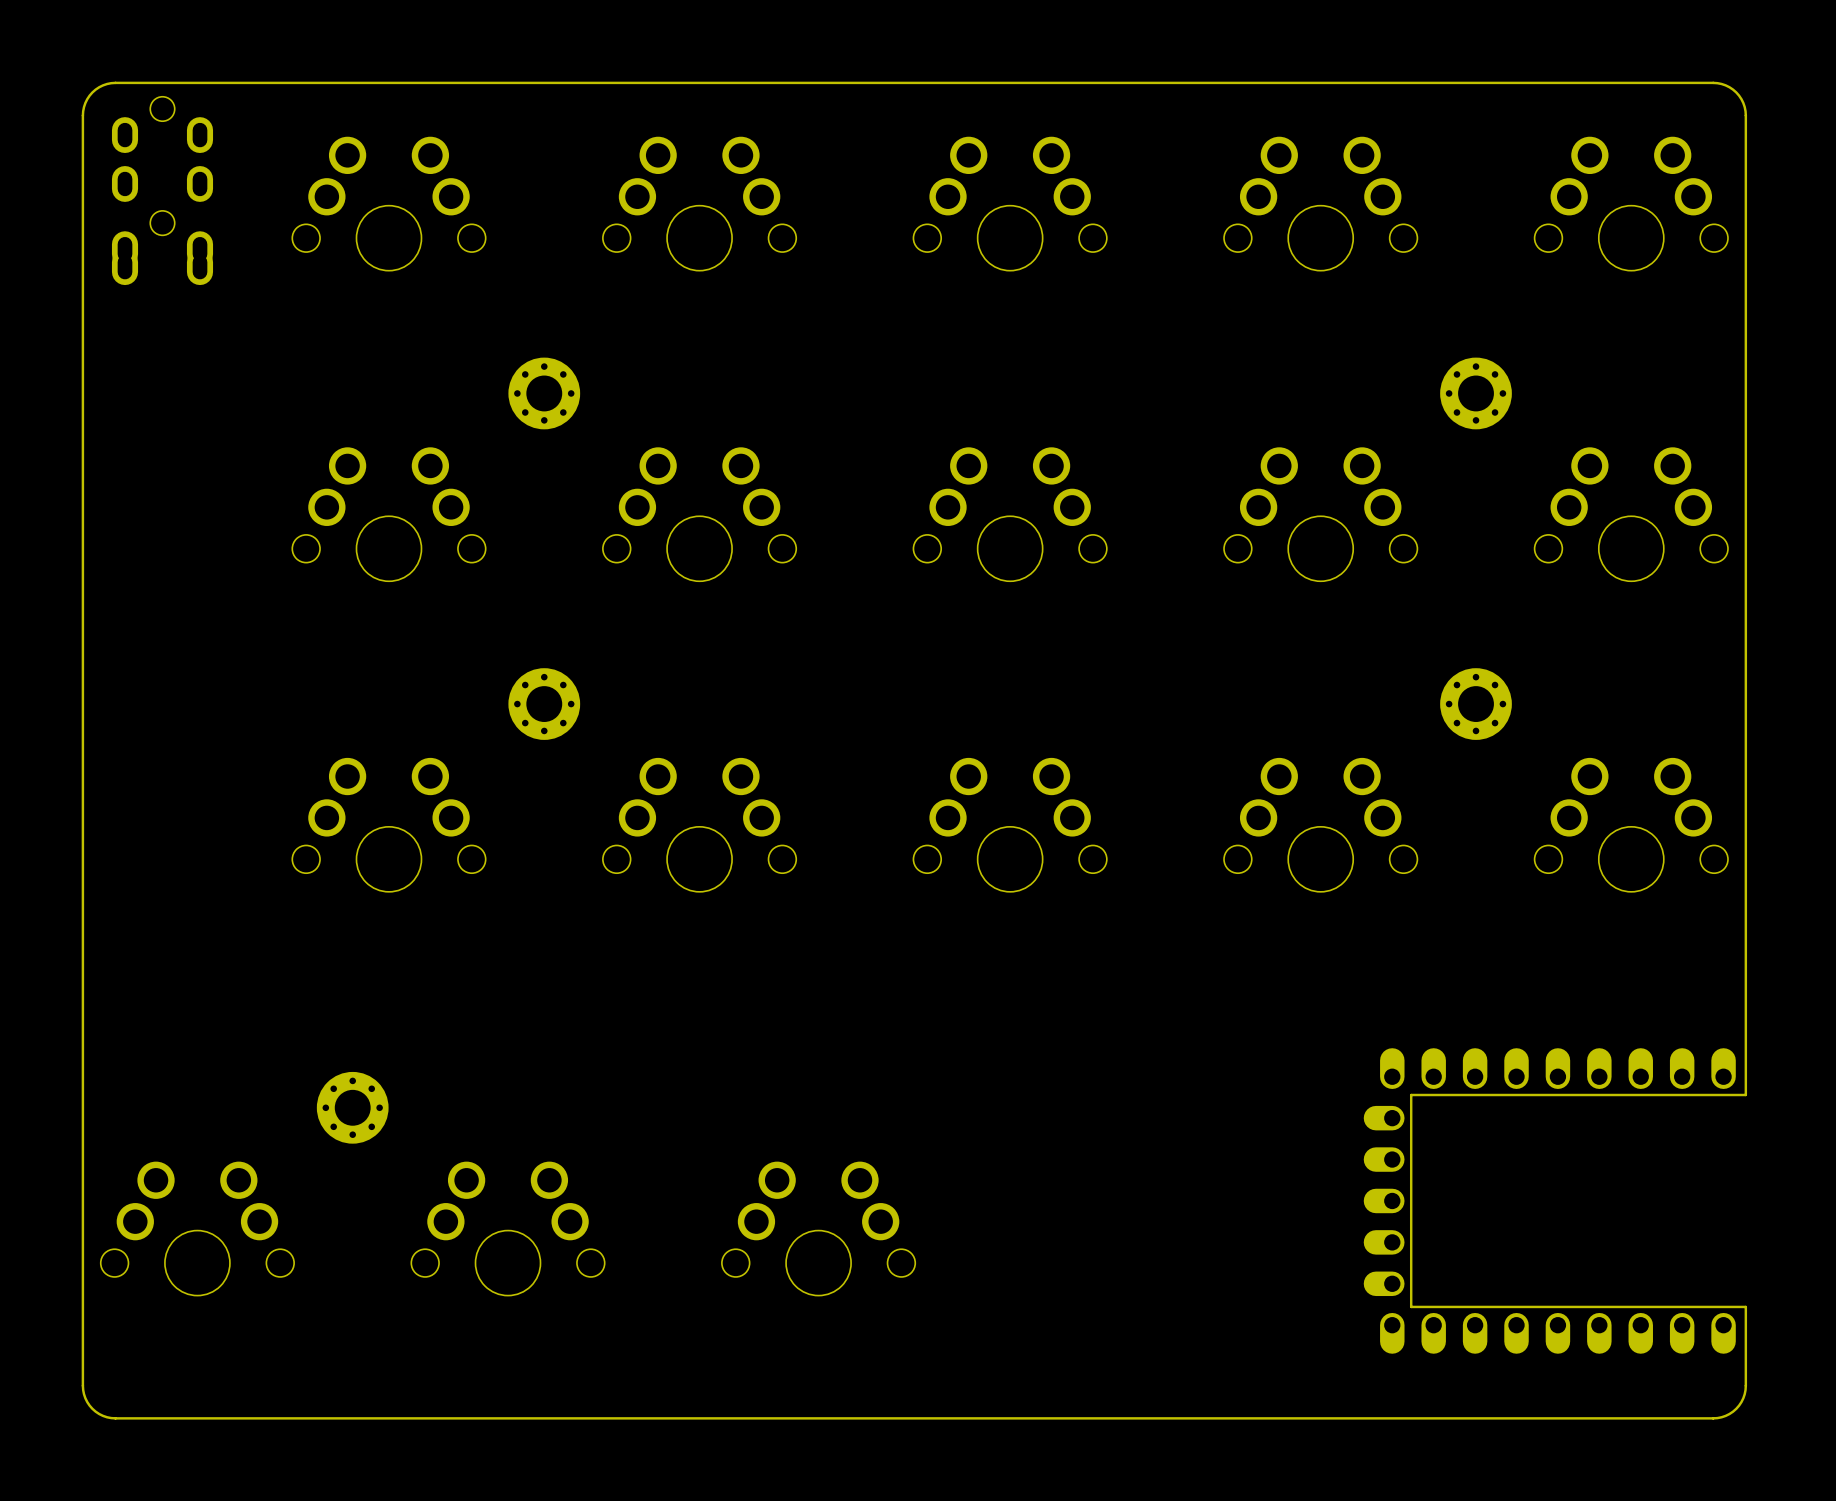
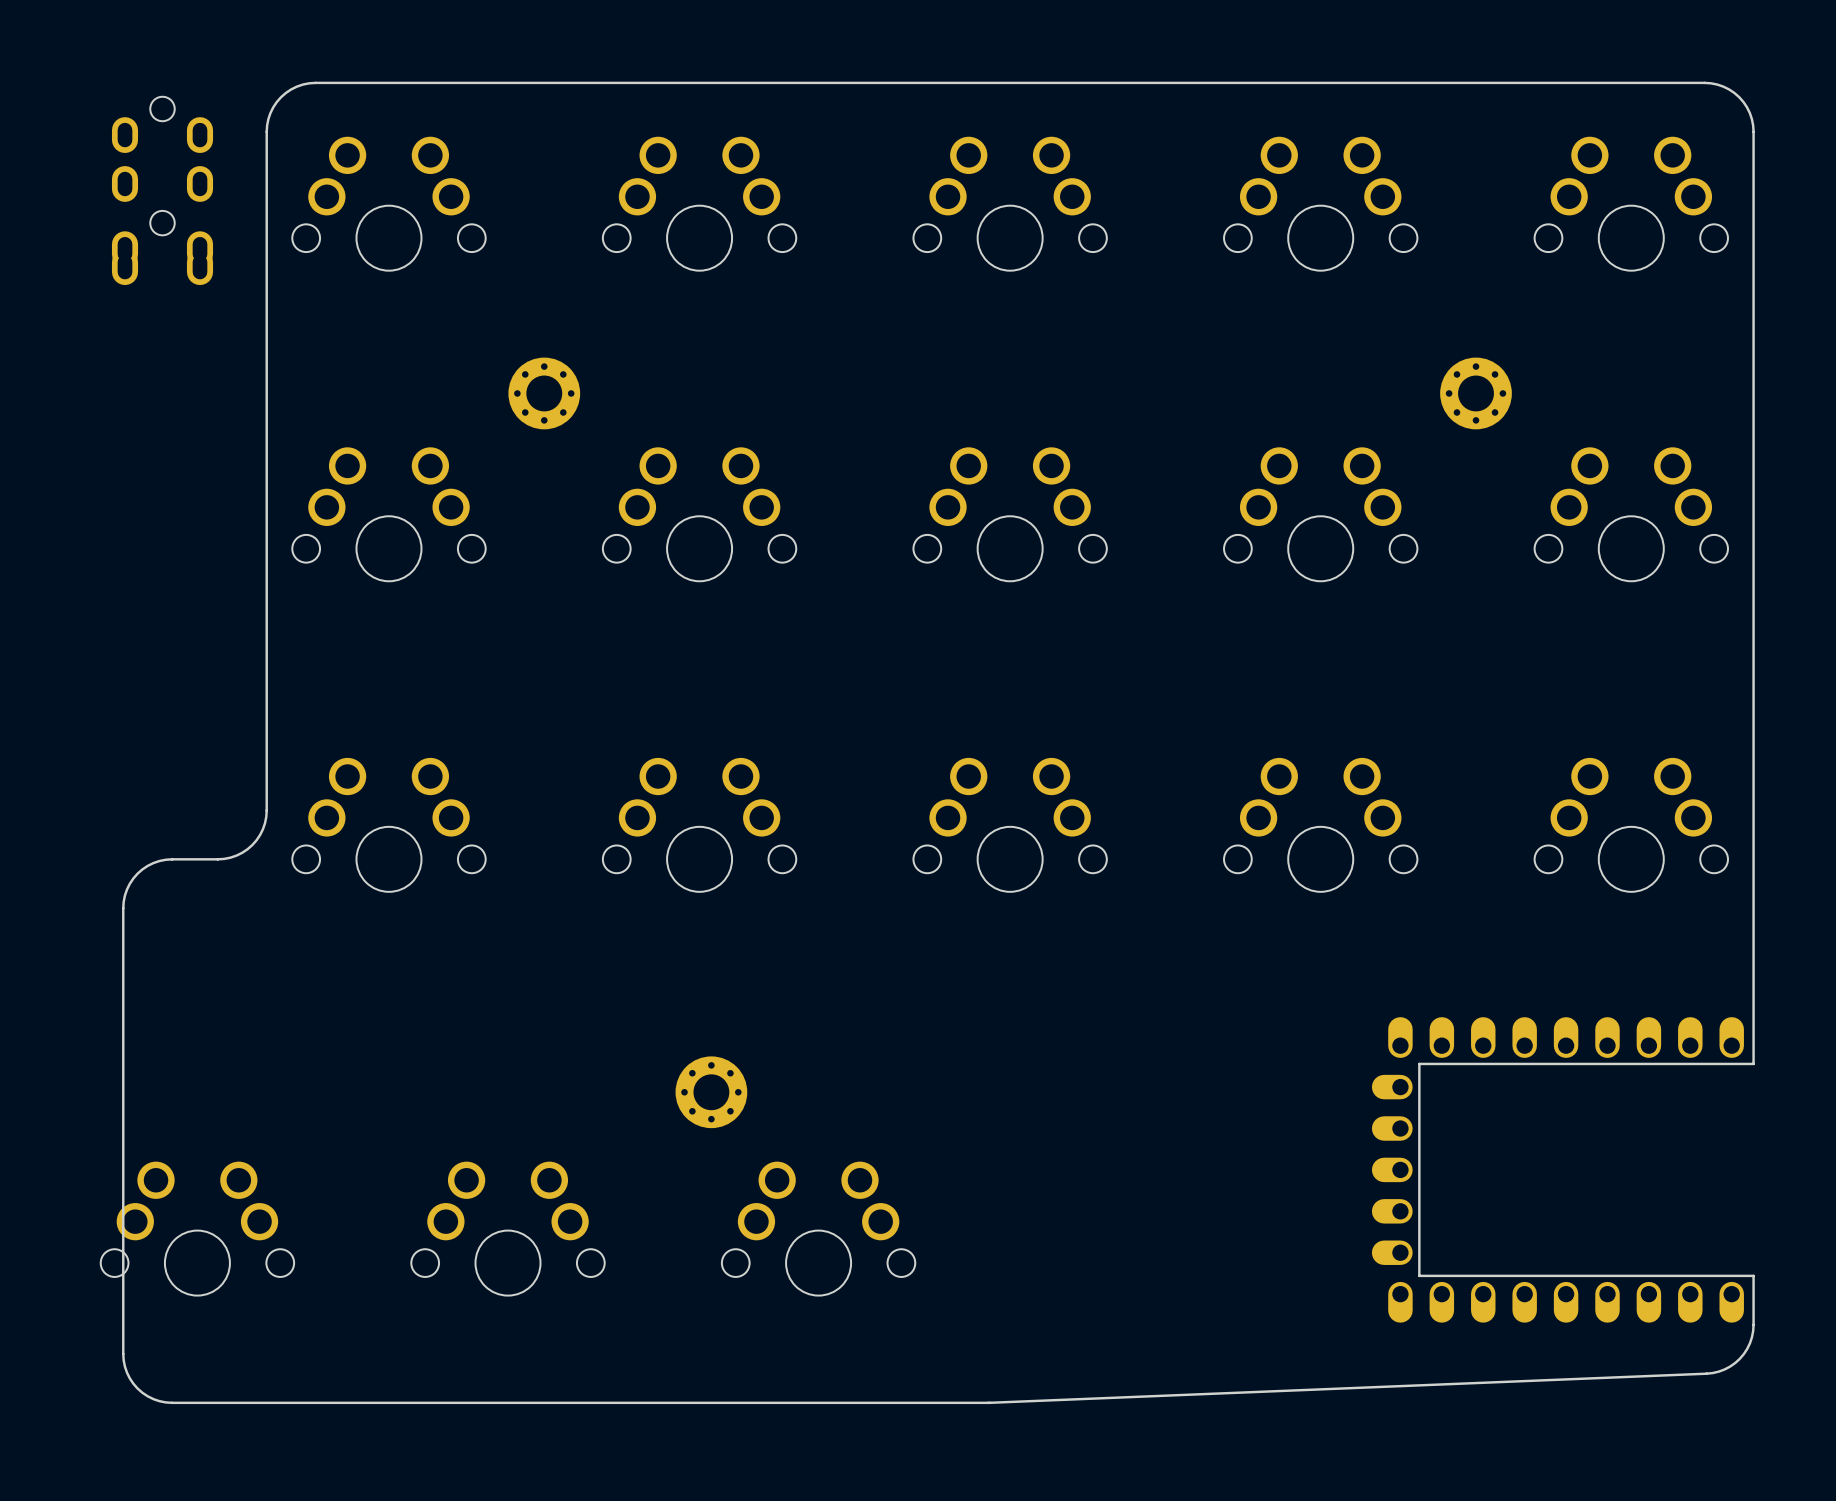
board edge: (1704, 82) (1721, 84) (1733, 89) (1743, 103) (1745, 115) (1745, 1095) (1411, 1095) (1411, 1306) (1745, 1306) (1745, 1390) (1741, 1402) (1733, 1411) (1725, 1415) (1713, 1418) (111, 1418) (103, 1415) (92, 1408) (85, 1398) (82, 1385) (83, 111) (85, 103) (92, 92) (99, 87) (111, 83) (315, 82) -> (1704, 82) (1723, 86) (1739, 97) (1749, 113) (1753, 131) (1753, 1063) (1419, 1063) (1419, 1275) (1753, 1275) (1751, 1337) (1747, 1348) (1735, 1362) (1724, 1369) (1706, 1373) (988, 1402) (165, 1402) (147, 1396) (137, 1388) (129, 1378) (123, 1360) (123, 901) (126, 889) (133, 878) (147, 865) (165, 859) (217, 859) (236, 855) (247, 849) (256, 840) (265, 823) (266, 810) (267, 125) (273, 107) (285, 93) (302, 84) (315, 82)
part: (544, 704) -> none
part: (1476, 704) -> none
part: none -> (711, 1092)
part: (352, 1107) -> none
part position: (1549, 1200) -> (1557, 1169)

